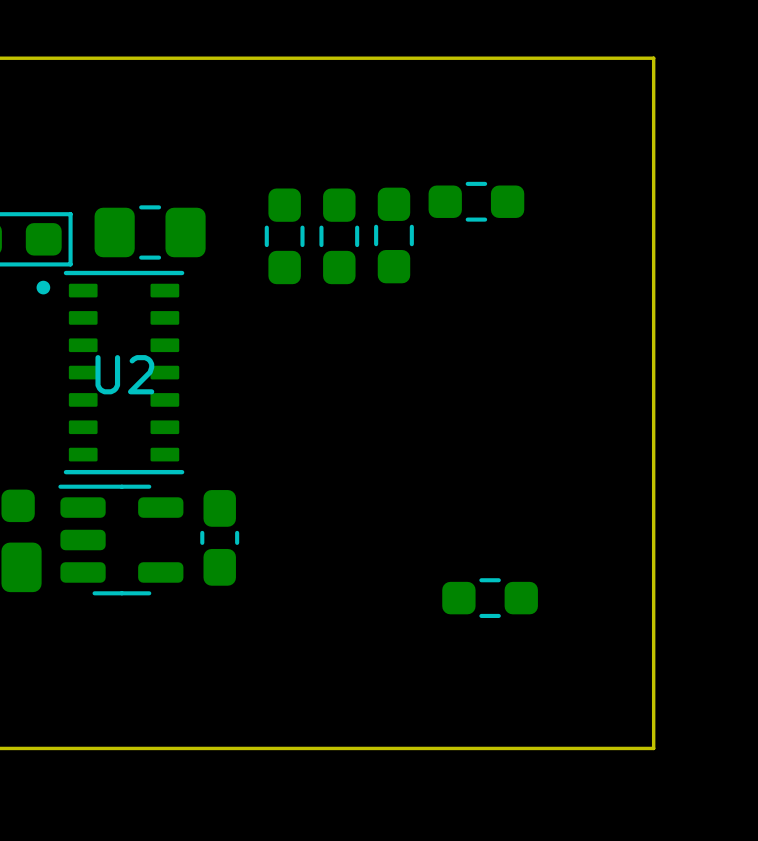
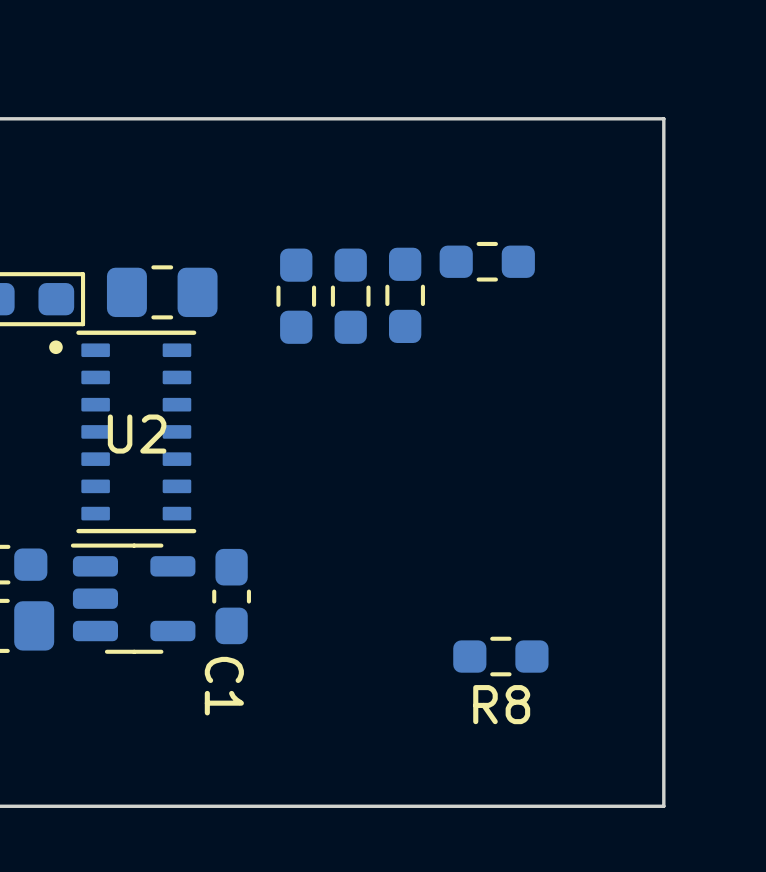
C1 name: none -> C1 (224, 686)
R8 name: none -> R8 (501, 704)

